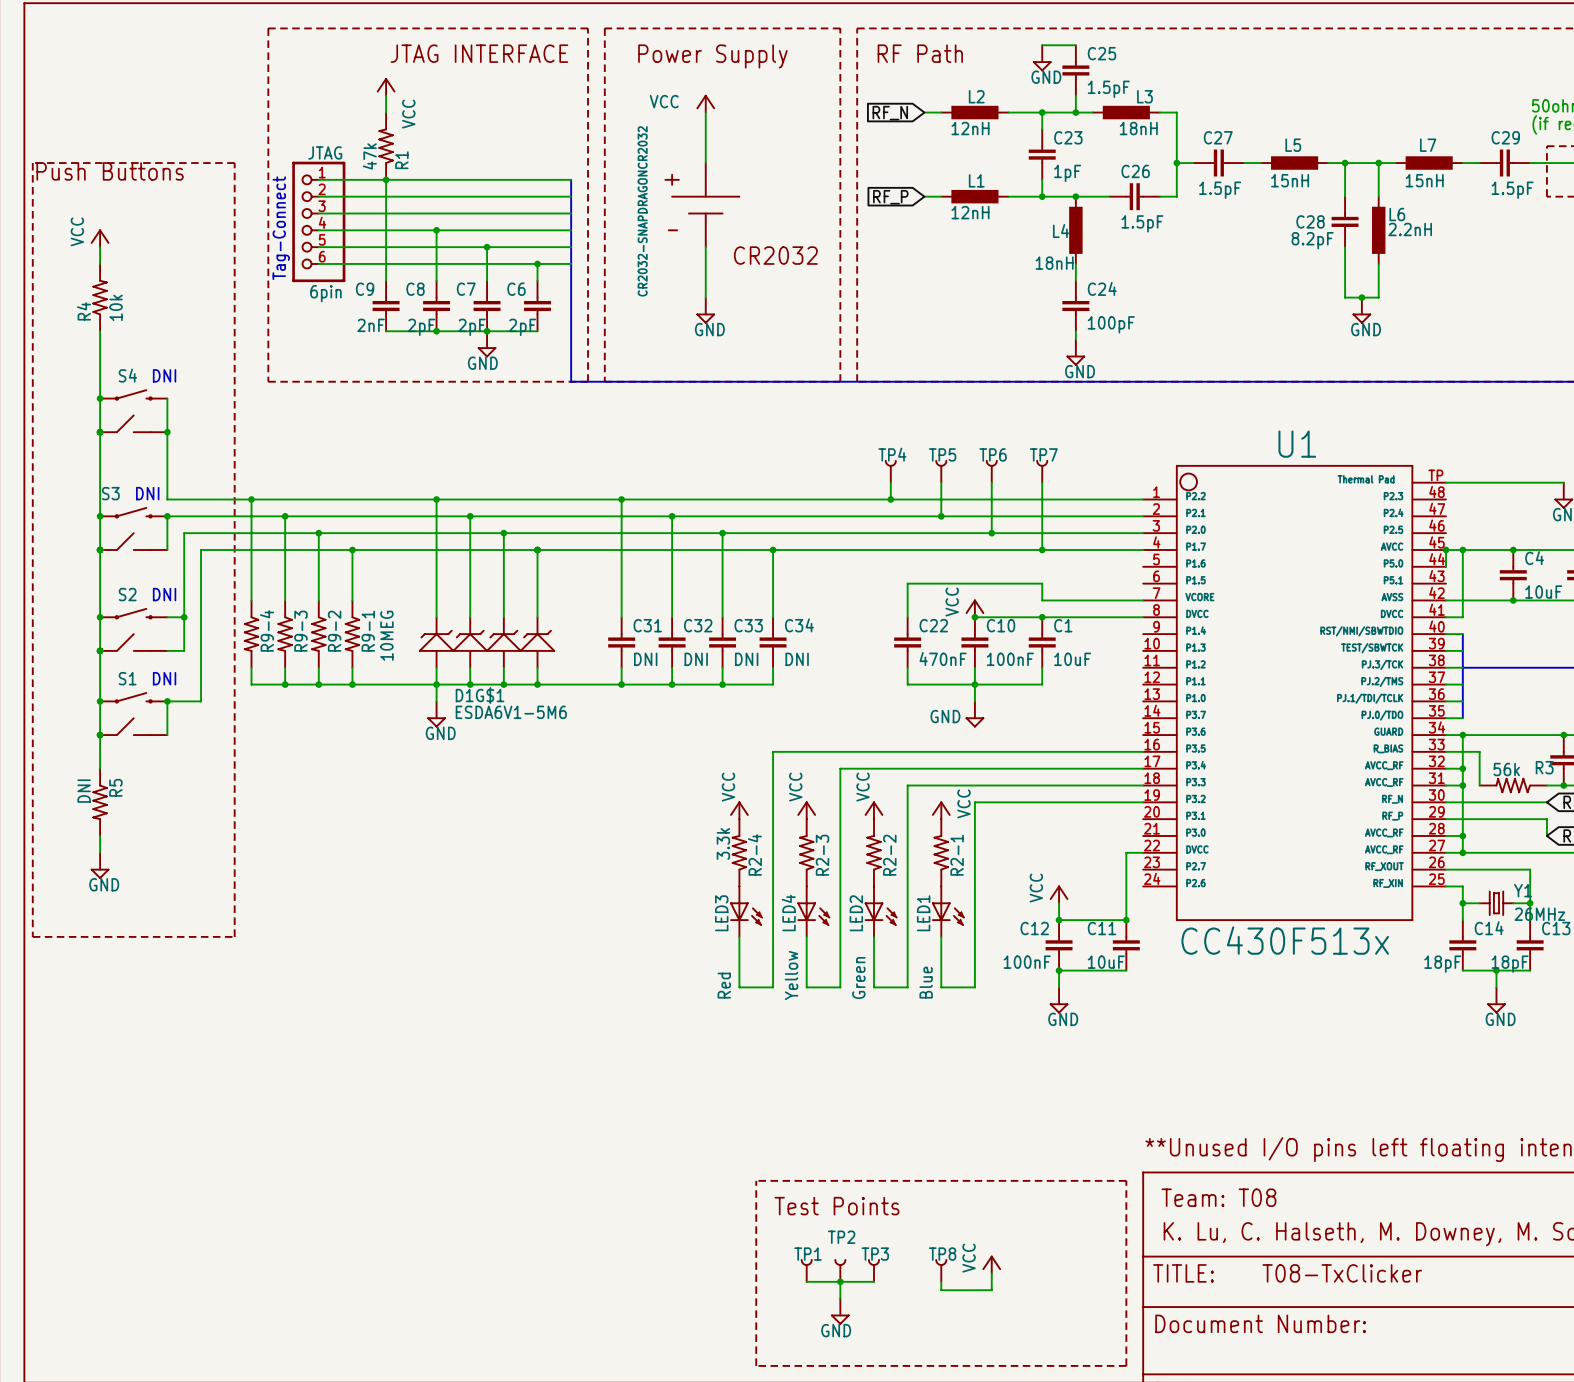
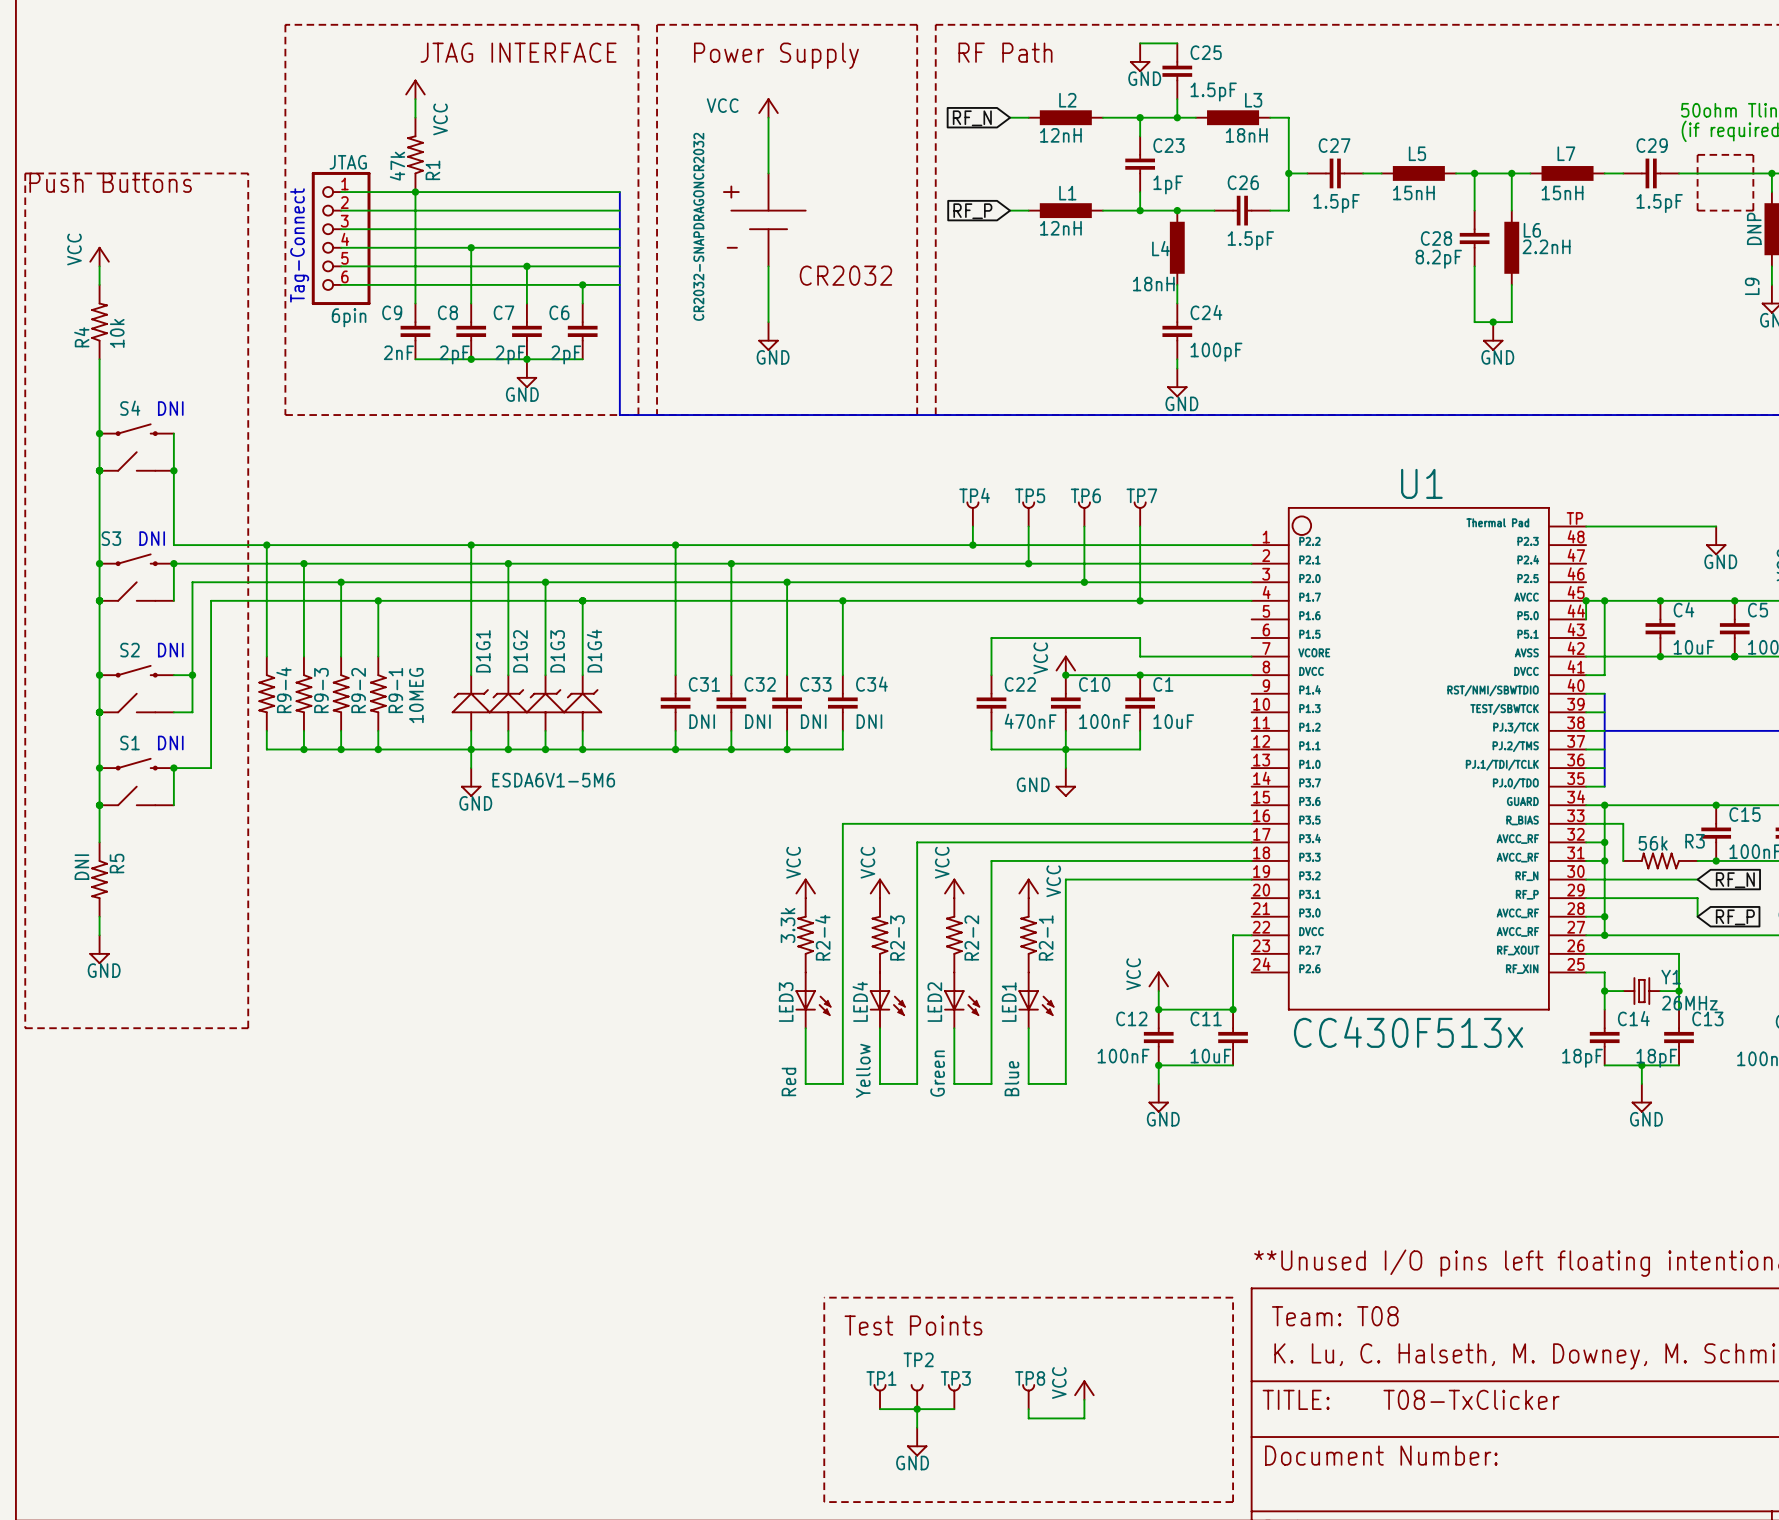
D1G2 name: none -> D1G2 (520, 651)
D1G3 name: none -> D1G3 (557, 651)
D1G4 name: none -> D1G4 (594, 651)
D1G$1 name: D1G$1 (480, 695) -> D1G1 (483, 651)

